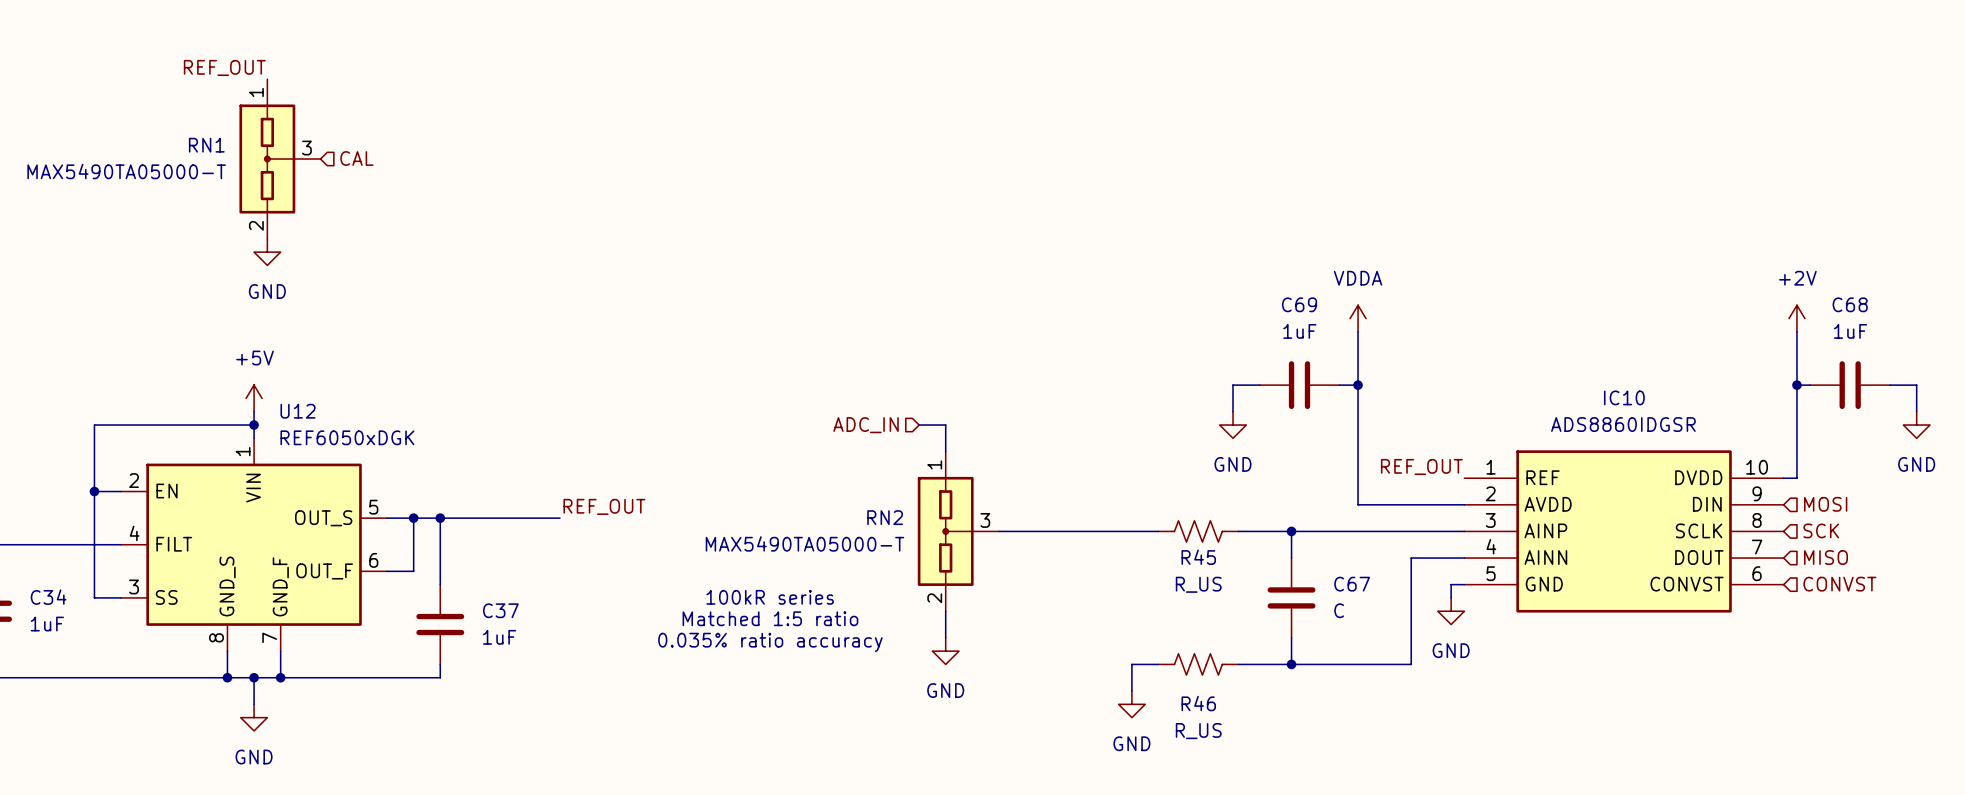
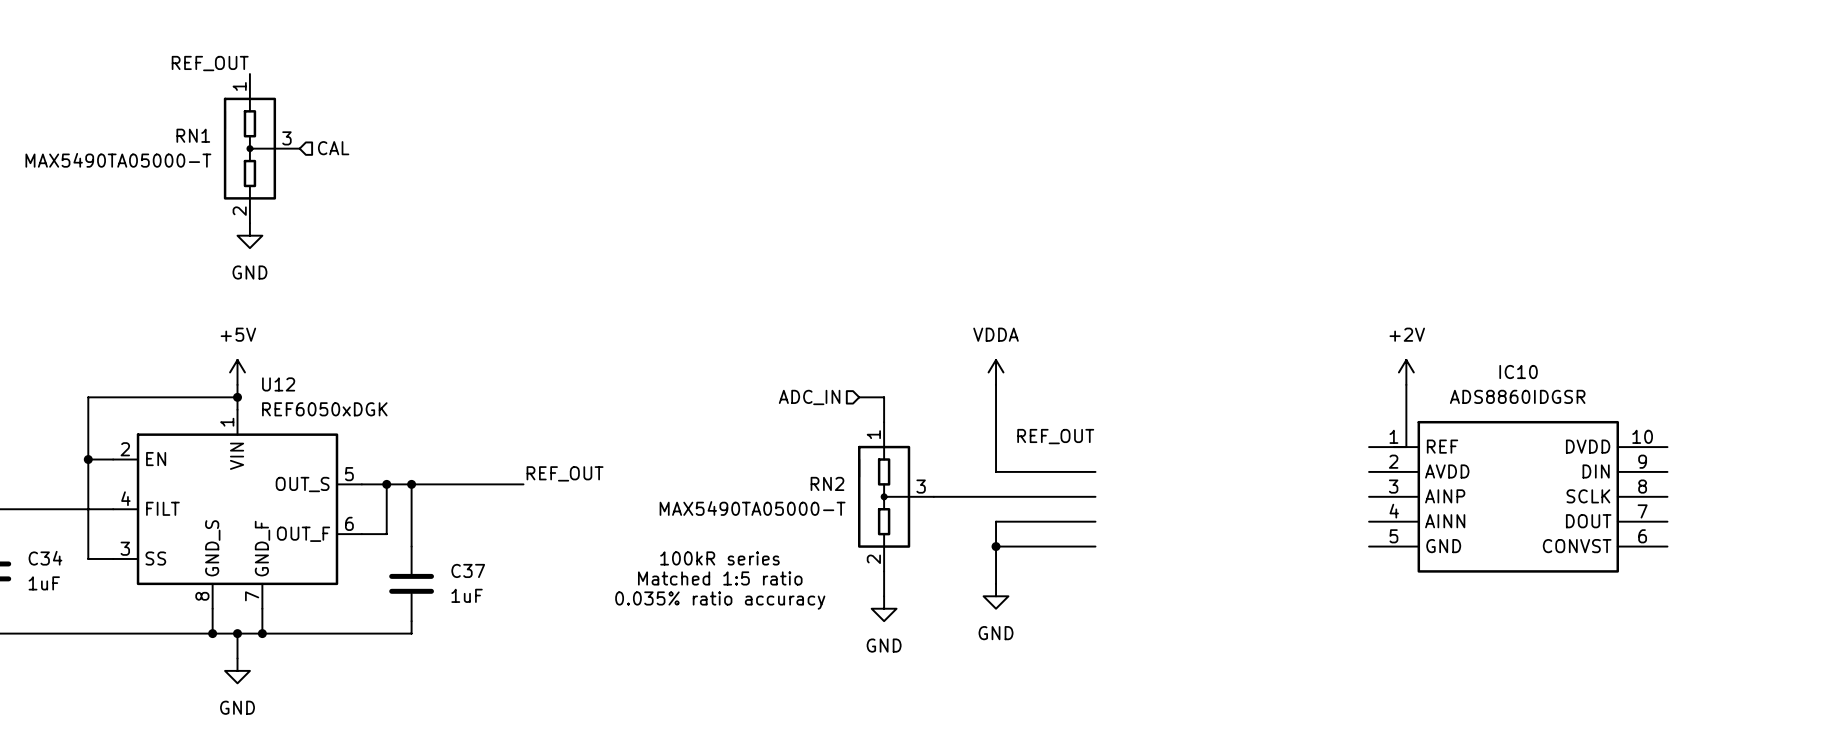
power symbol: VDDA (1358, 318) -> none
power symbol: +2V (1796, 318) -> none
wire: (1358, 331) (1358, 504) (1464, 504) -> none
wire: (1796, 331) (1796, 478) (1783, 478) -> none
wire: (1259, 385) (1233, 385) (1233, 411) -> none
C69: 1uF (1299, 385) -> none
wire: (1339, 385) (1358, 385) -> none
junction: (1358, 385) -> none
wire: (1796, 385) (1810, 385) -> none
junction: (1796, 385) -> none
C68: 1uF (1850, 385) -> none
wire: (1890, 385) (1916, 385) (1916, 411) -> none
power symbol: none -> VDDA (996, 372)
power symbol: none -> +2V (1406, 372)
wire: none -> (996, 384) (996, 471) (1095, 471)
wire: none -> (1406, 384) (1406, 447) (1393, 447)
power symbol: GND (1233, 425) -> none
power symbol: GND (1916, 425) -> none
label: none -> REF_OUT (1055, 436)
label: REF_OUT (1421, 466) -> none
hierarchical label: MOSI (1825, 504) -> none
hierarchical label: SCK (1821, 530) -> none
R45: R_US (1198, 531) -> none
wire: (1238, 531) (1464, 531) -> none
wire: (1291, 531) (1291, 558) -> none
junction: (1291, 531) -> none
hierarchical label: MISO (1825, 557) -> none
wire: none -> (1095, 521) (996, 521) (996, 583)
wire: (1464, 558) (1411, 558) (1411, 664) (1238, 664) -> none
wire: none -> (996, 546) (1095, 546)
junction: none -> (996, 546)
wire: (1464, 584) (1451, 584) (1451, 597) -> none
hierarchical label: CONVST (1839, 584) -> none
C67: C (1291, 597) -> none
power symbol: GND (1451, 611) -> none
wire: (1291, 637) (1291, 664) -> none
wire: (1158, 664) (1131, 664) (1131, 691) -> none
R46: R_US (1198, 664) -> none
junction: (1291, 664) -> none
power symbol position: GND (1131, 704) -> GND (996, 596)

